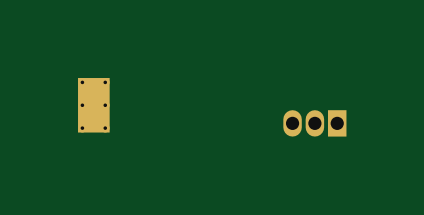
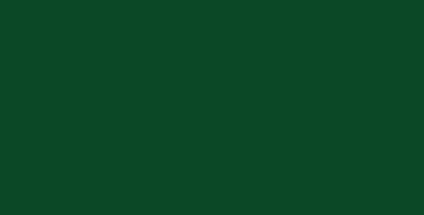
part: (93, 105) -> none
part: (314, 123) -> none

